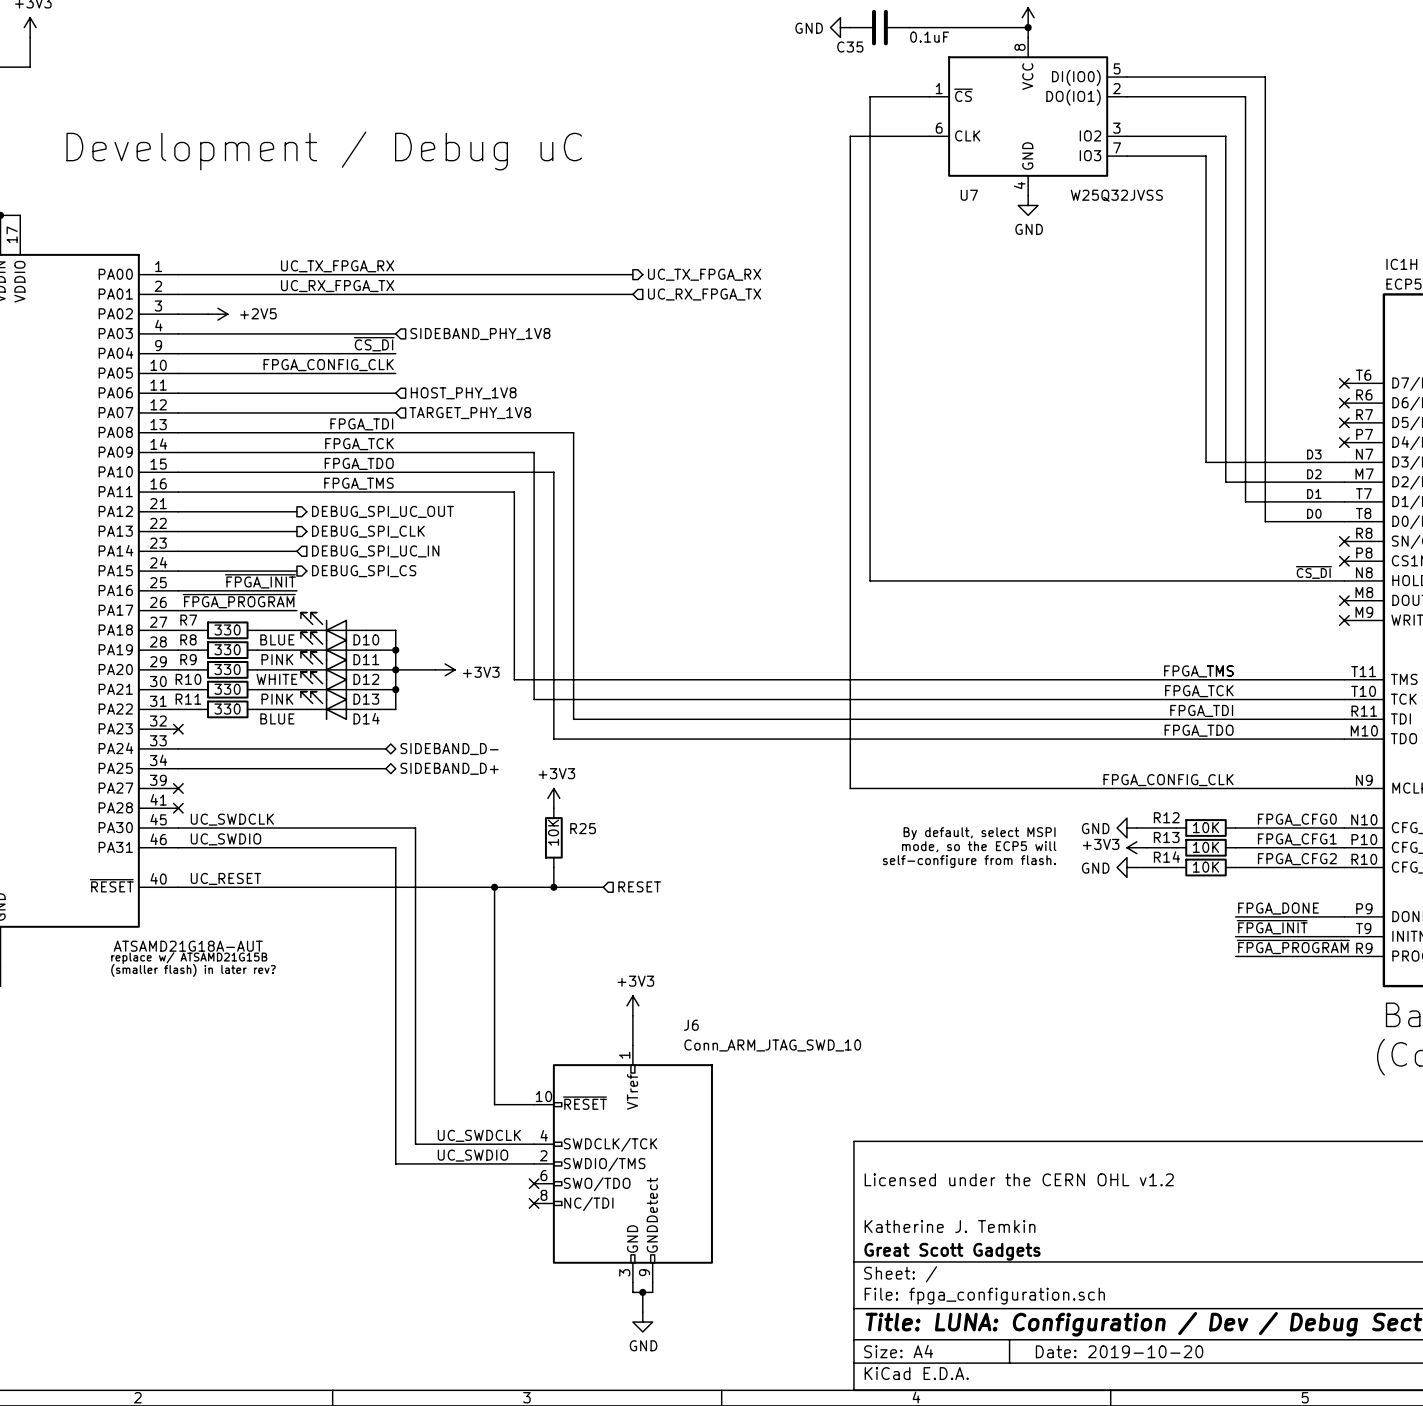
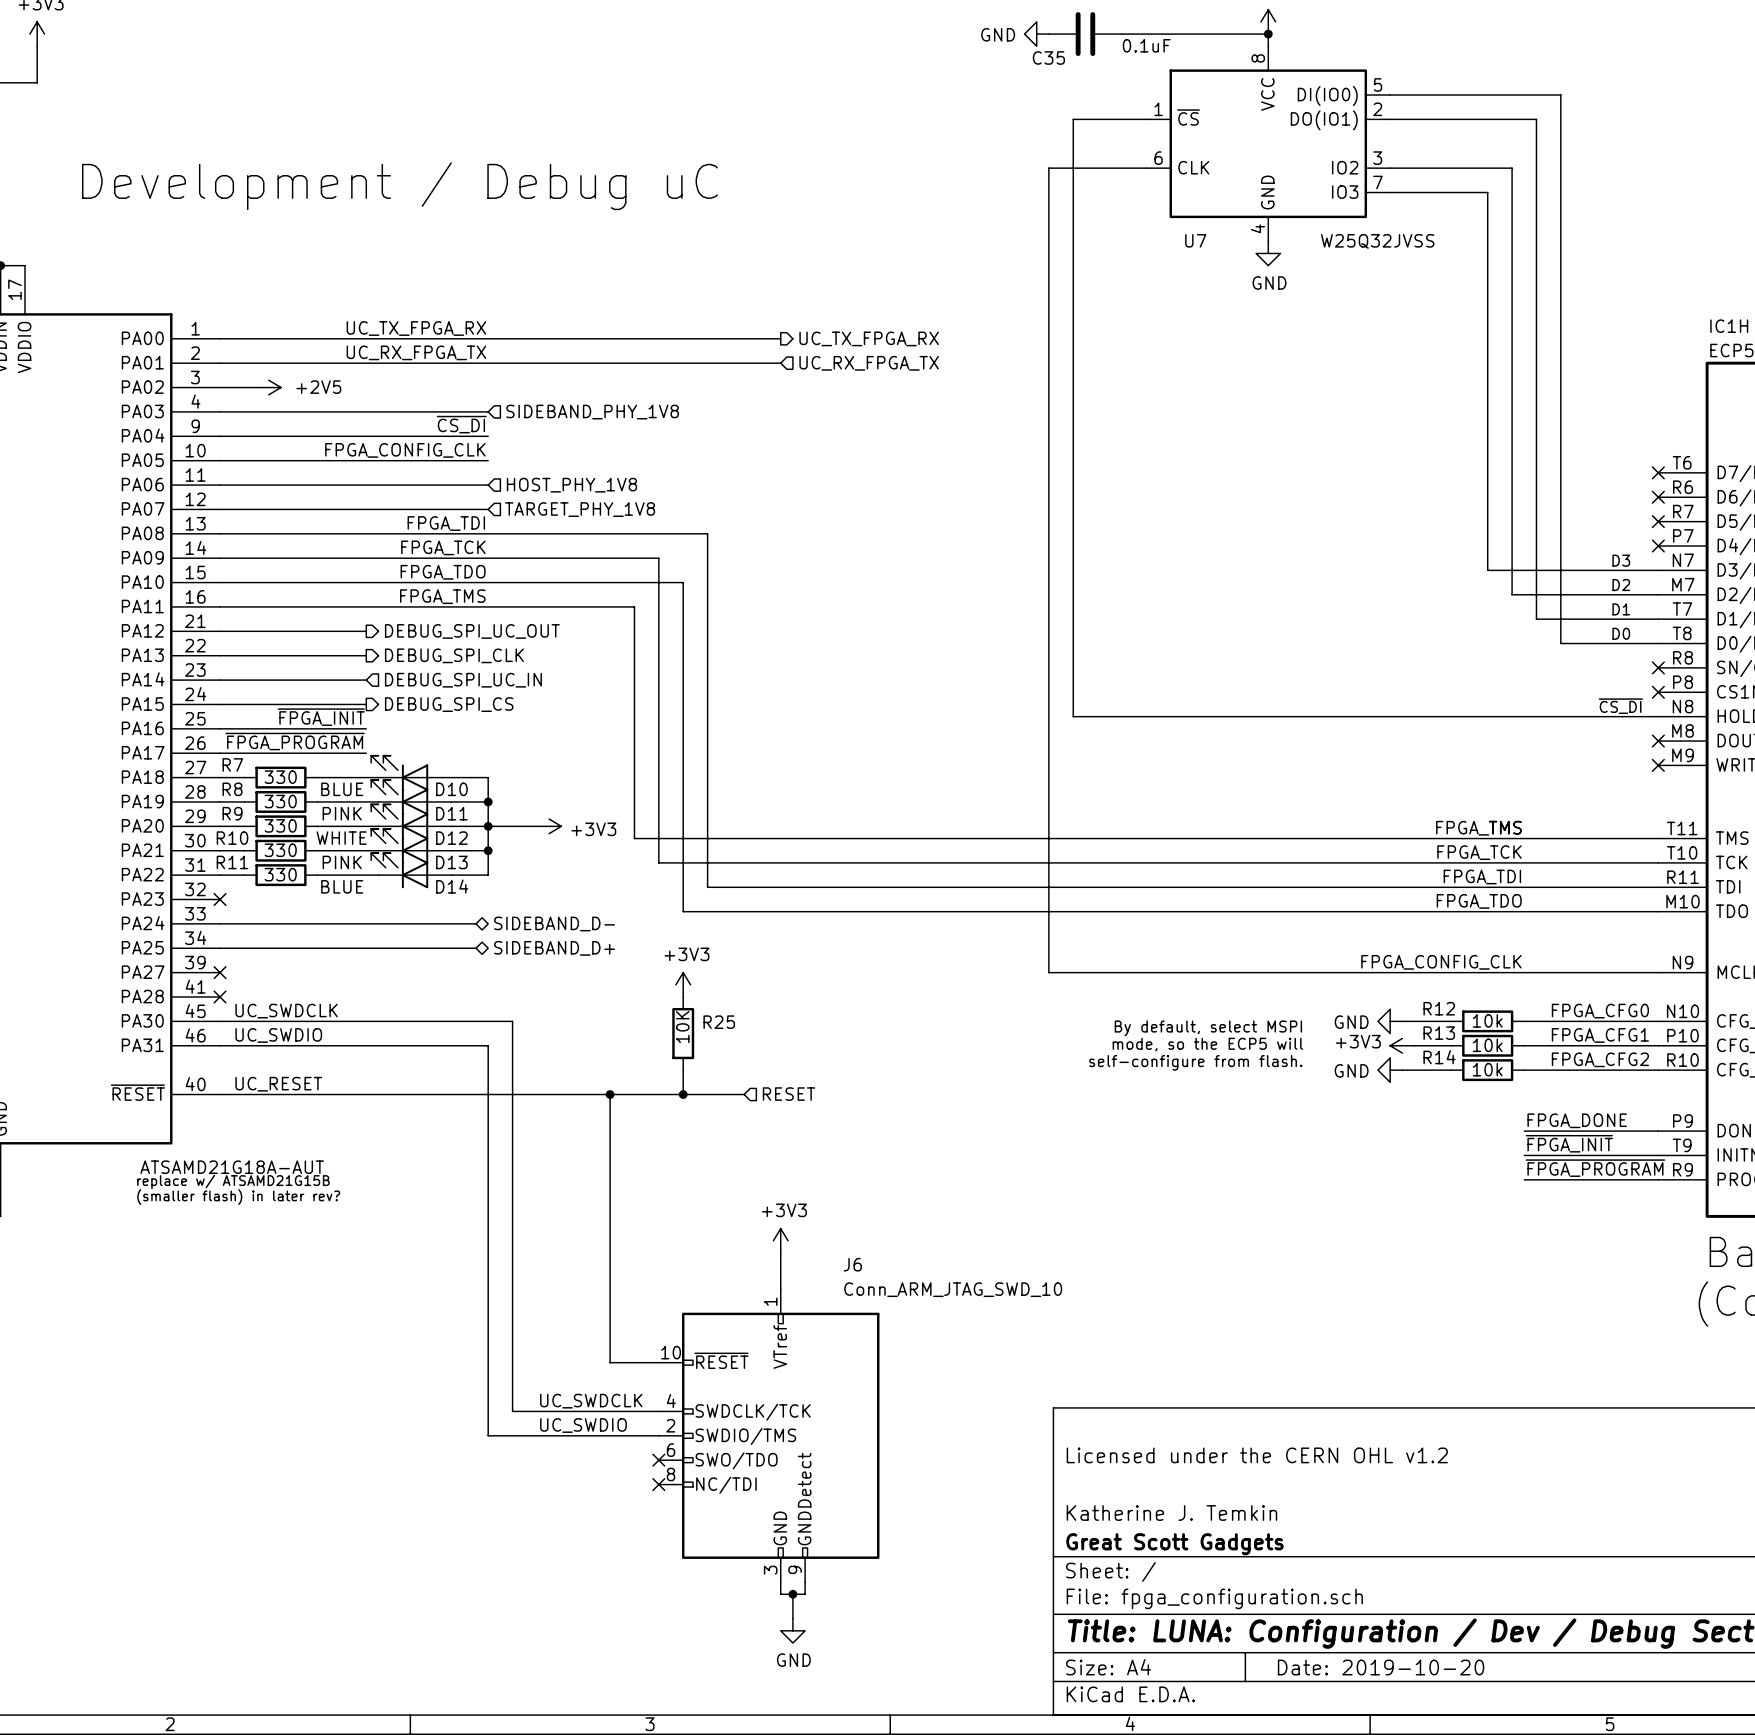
R12 value: 10K (1206, 827) -> 10k (1487, 1020)
R13 value: 10K (1206, 847) -> 10k (1487, 1045)
R14 value: 10K (1206, 867) -> 10k (1487, 1069)

